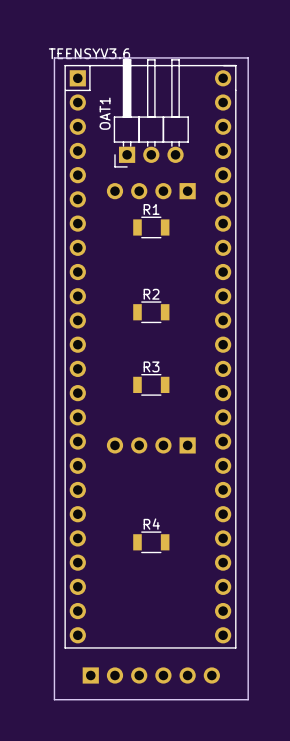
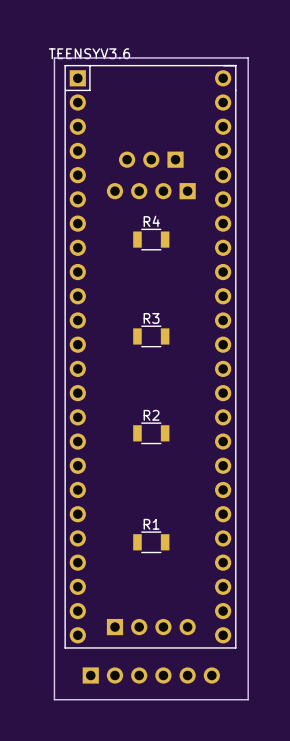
OAT1 side: top (151, 113) -> bottom (151, 159)
R1: (151, 227) -> none
R4: none -> (151, 239)
R2 position: (151, 312) -> (151, 433)
R3 position: (151, 384) -> (151, 336)
part rotation: 0° (151, 445) -> 180° (151, 627)
part position: (151, 445) -> (151, 627)
R4 name: R4 (151, 524) -> R1 (151, 524)

